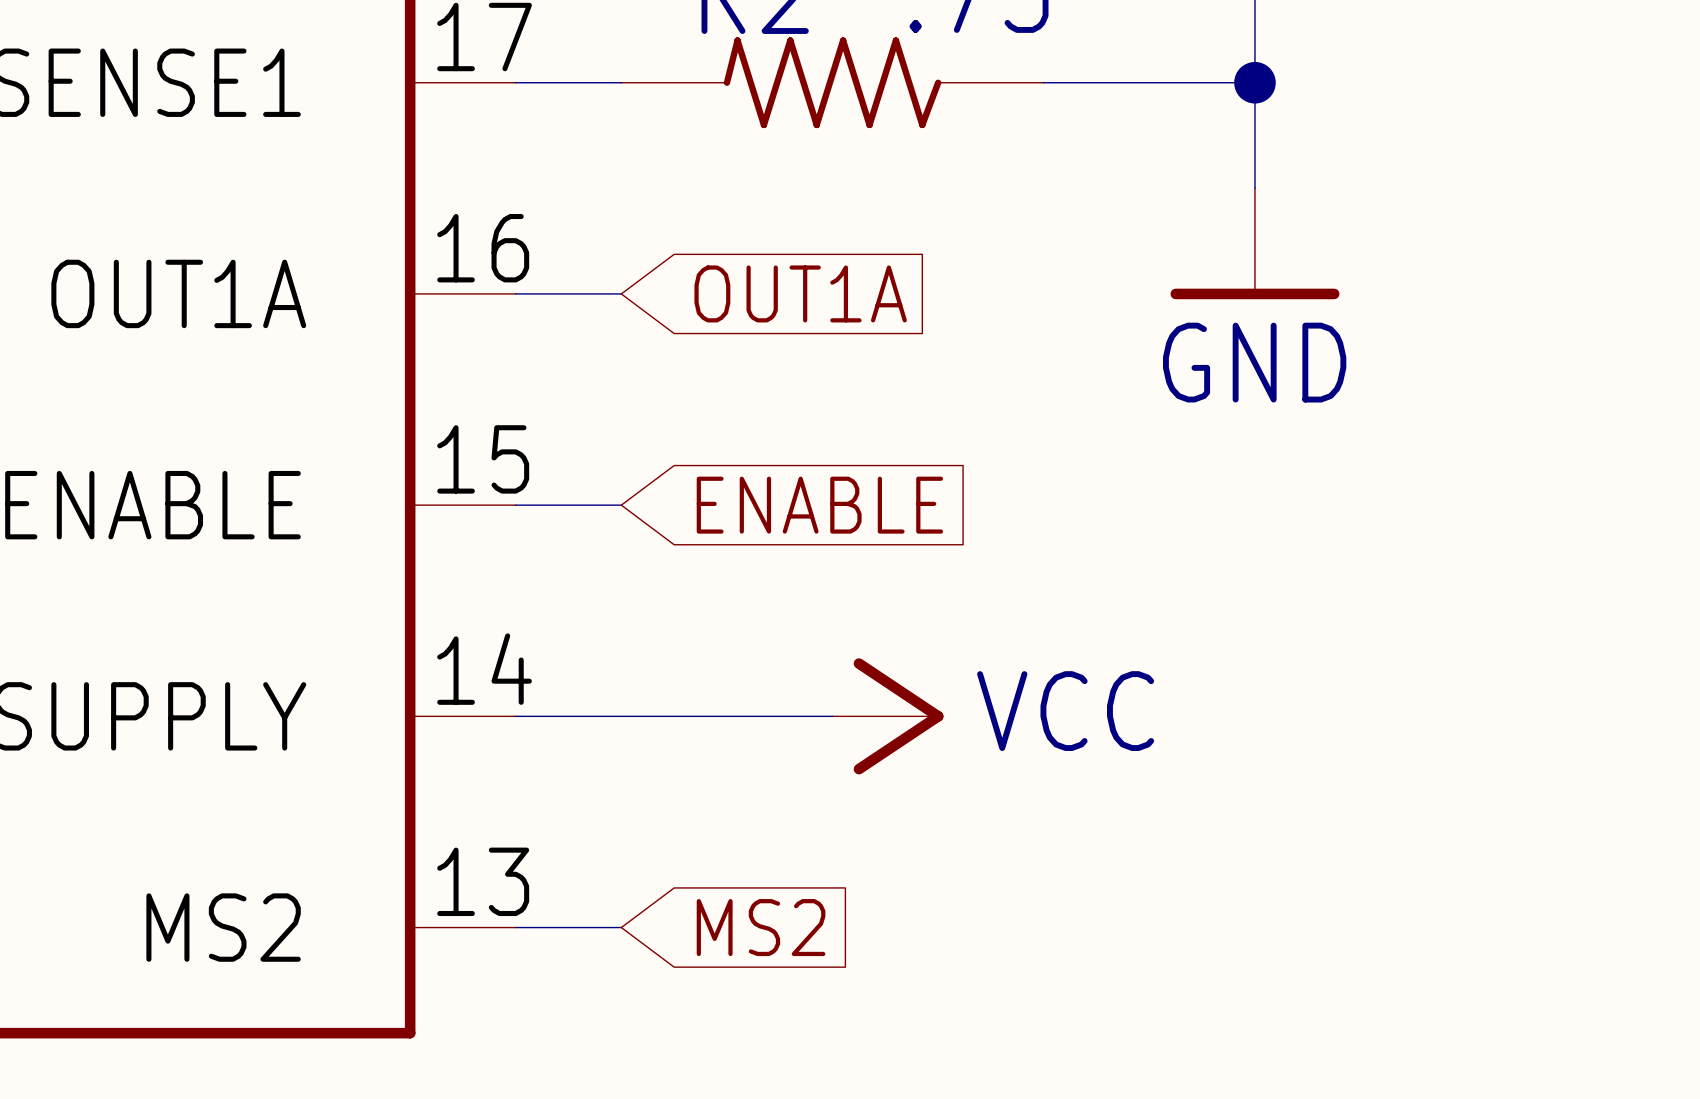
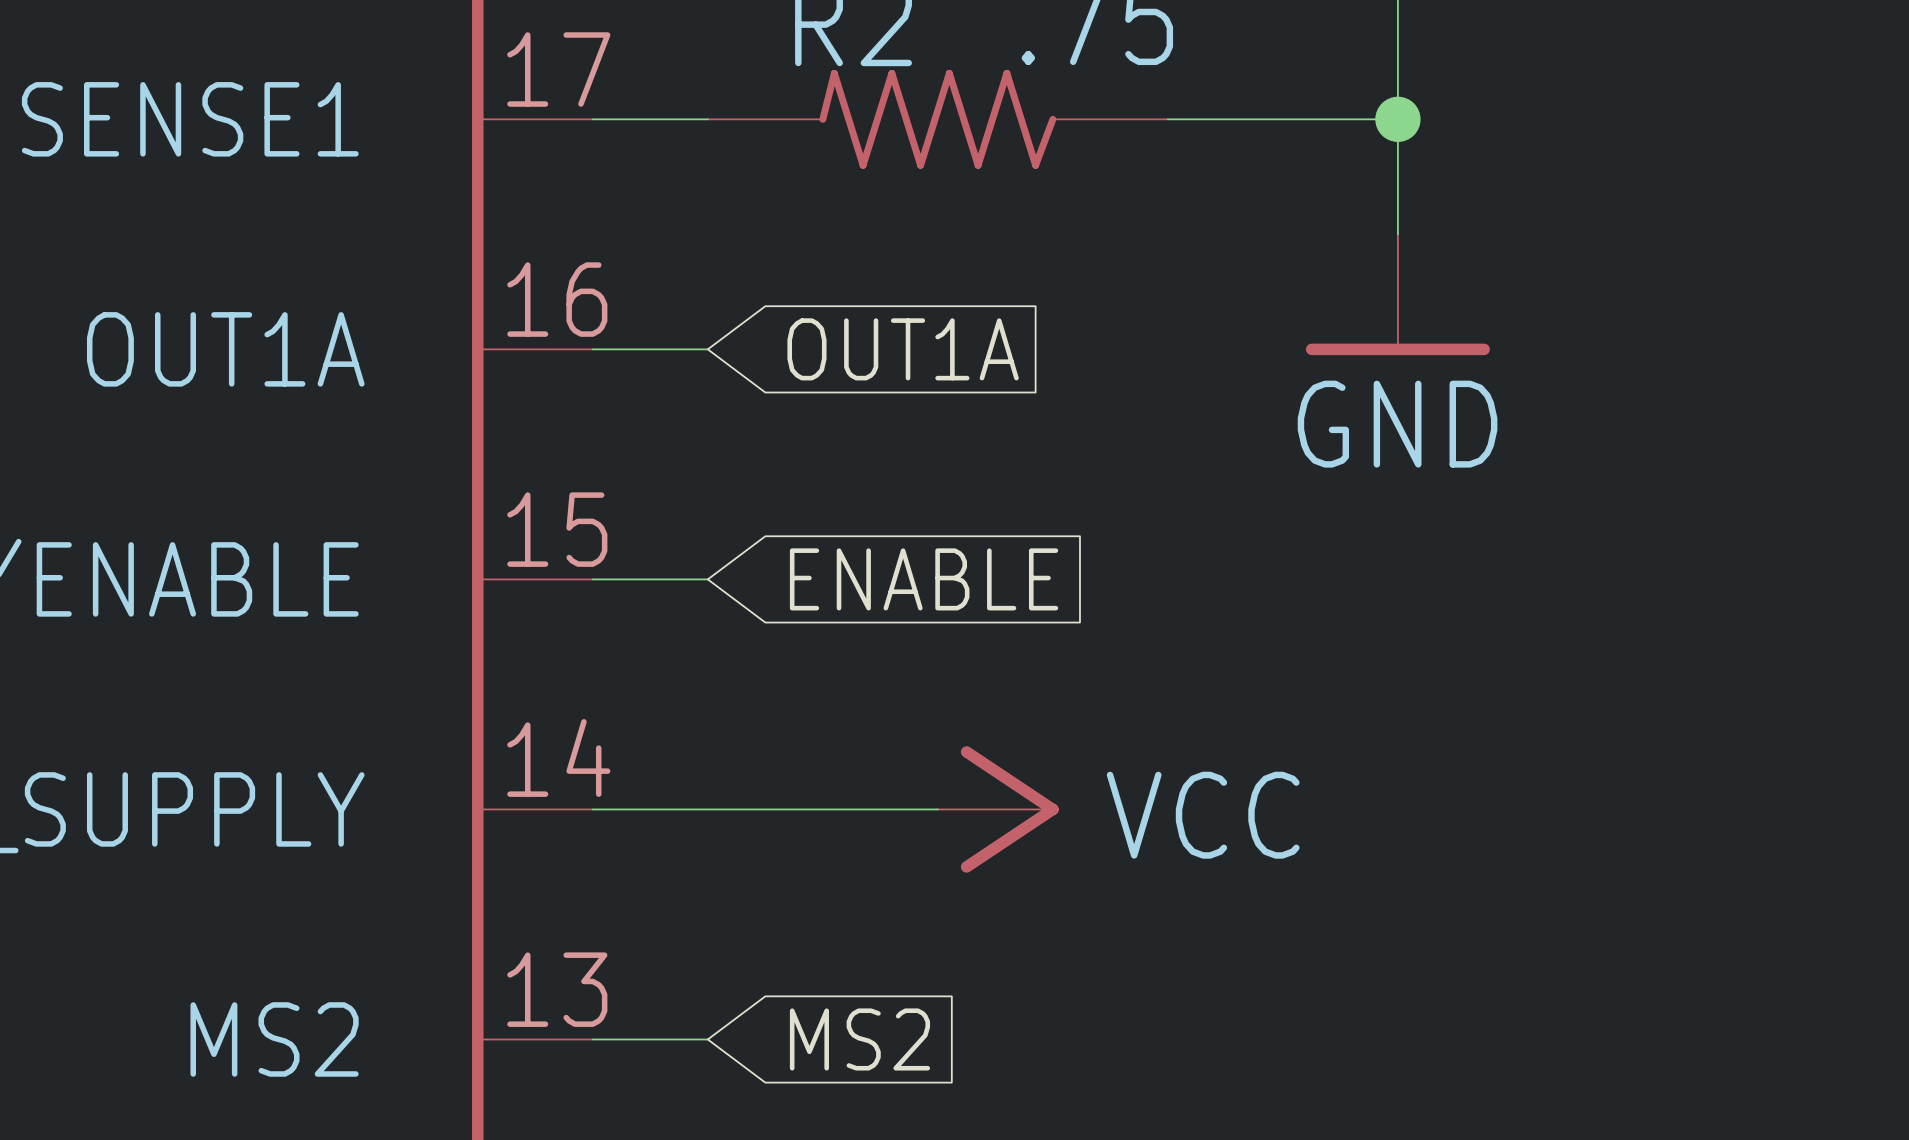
power symbol text position: VCC (1065, 711) -> VCC (1203, 815)

